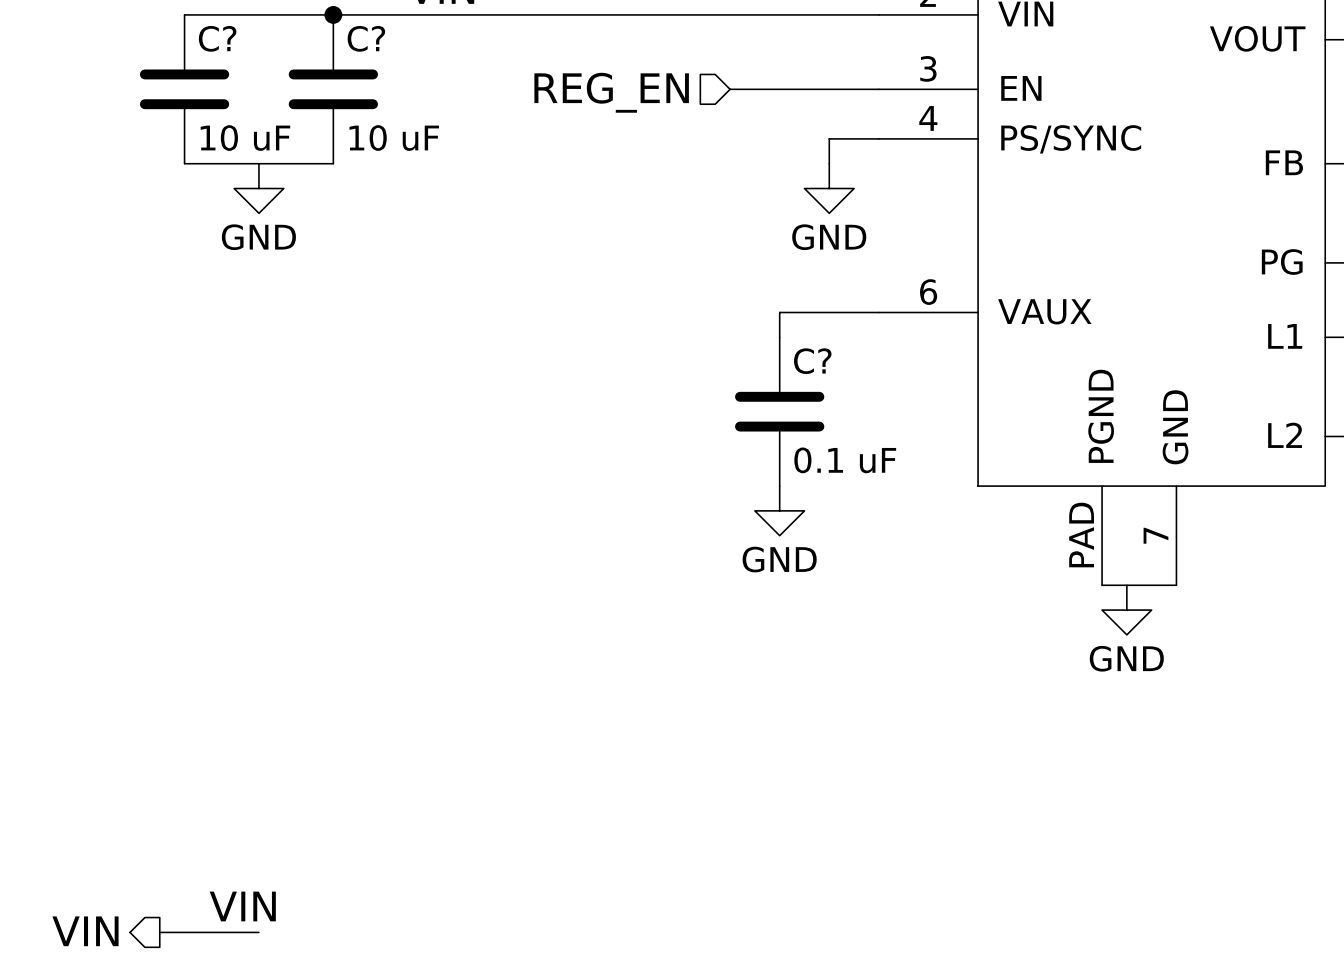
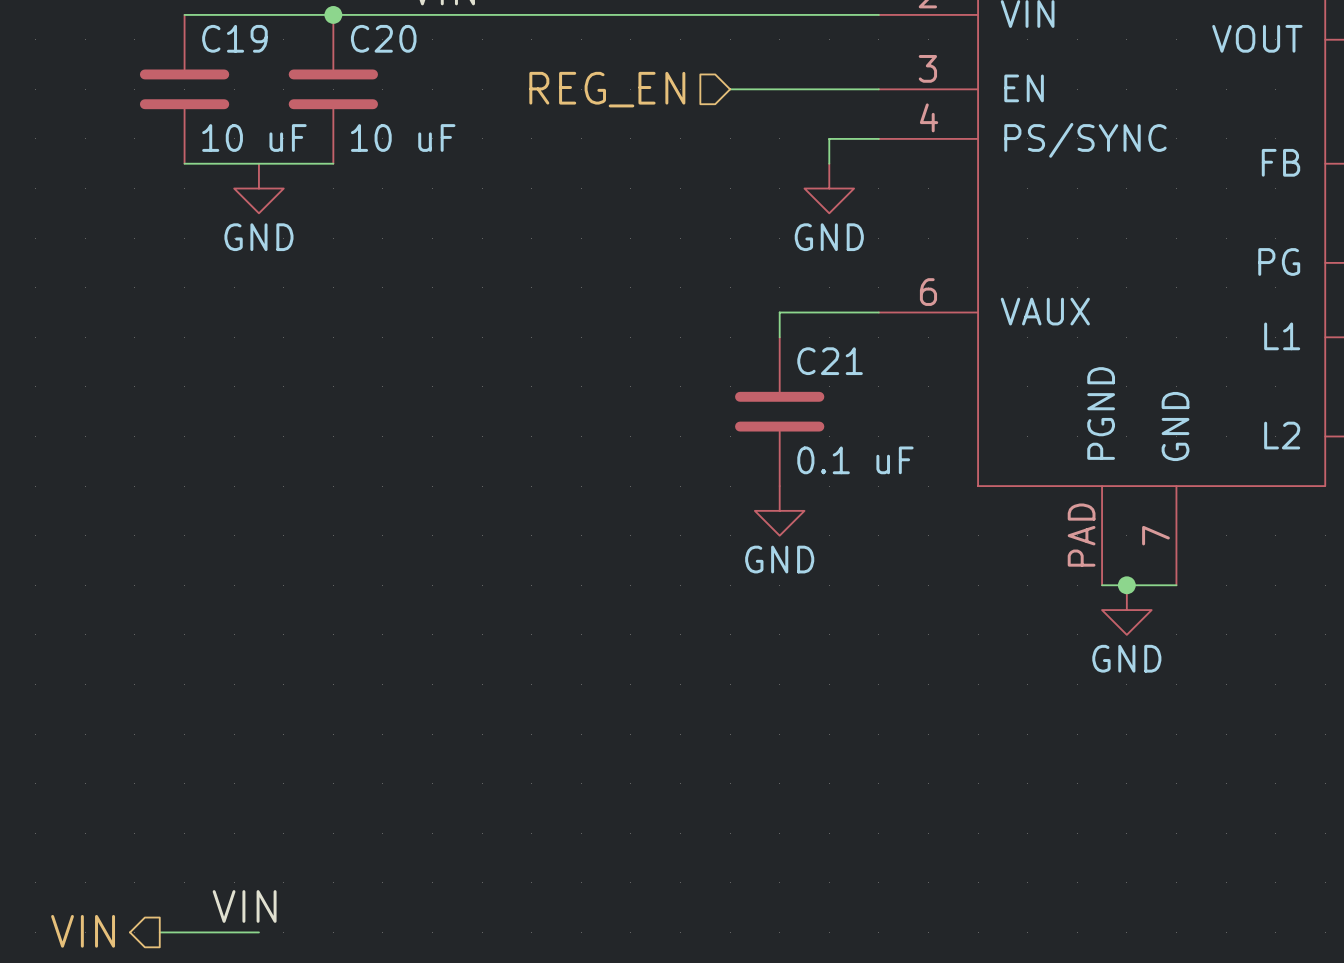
C? name: C? (217, 38) -> C19 (234, 38)
C? name: C? (366, 38) -> C20 (383, 38)
C? name: C? (812, 361) -> C21 (830, 361)
junction: none -> (1126, 585)

